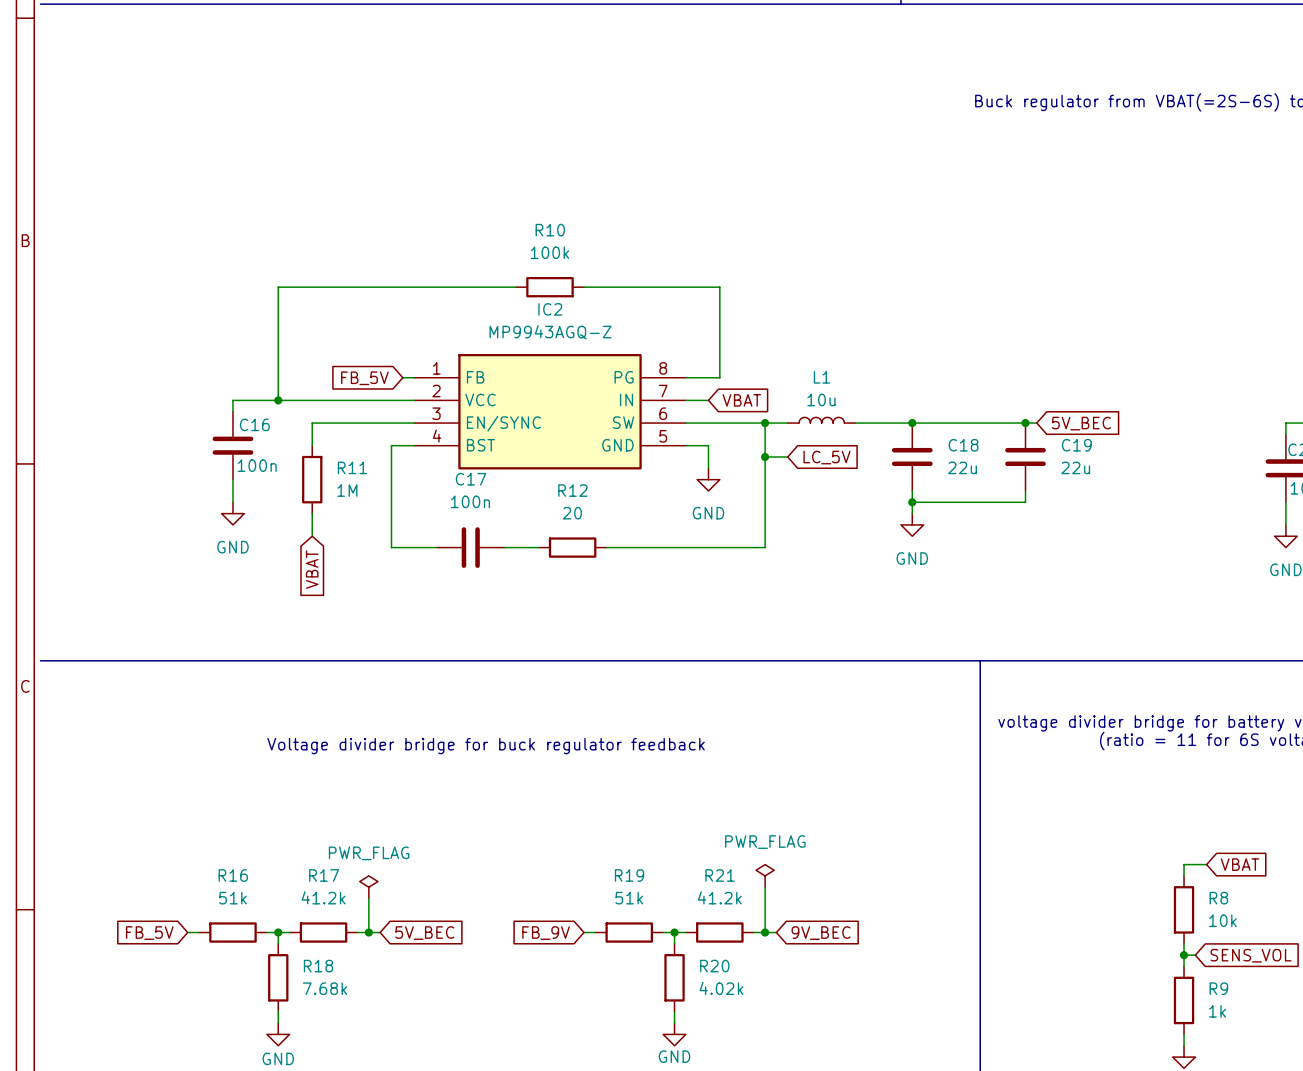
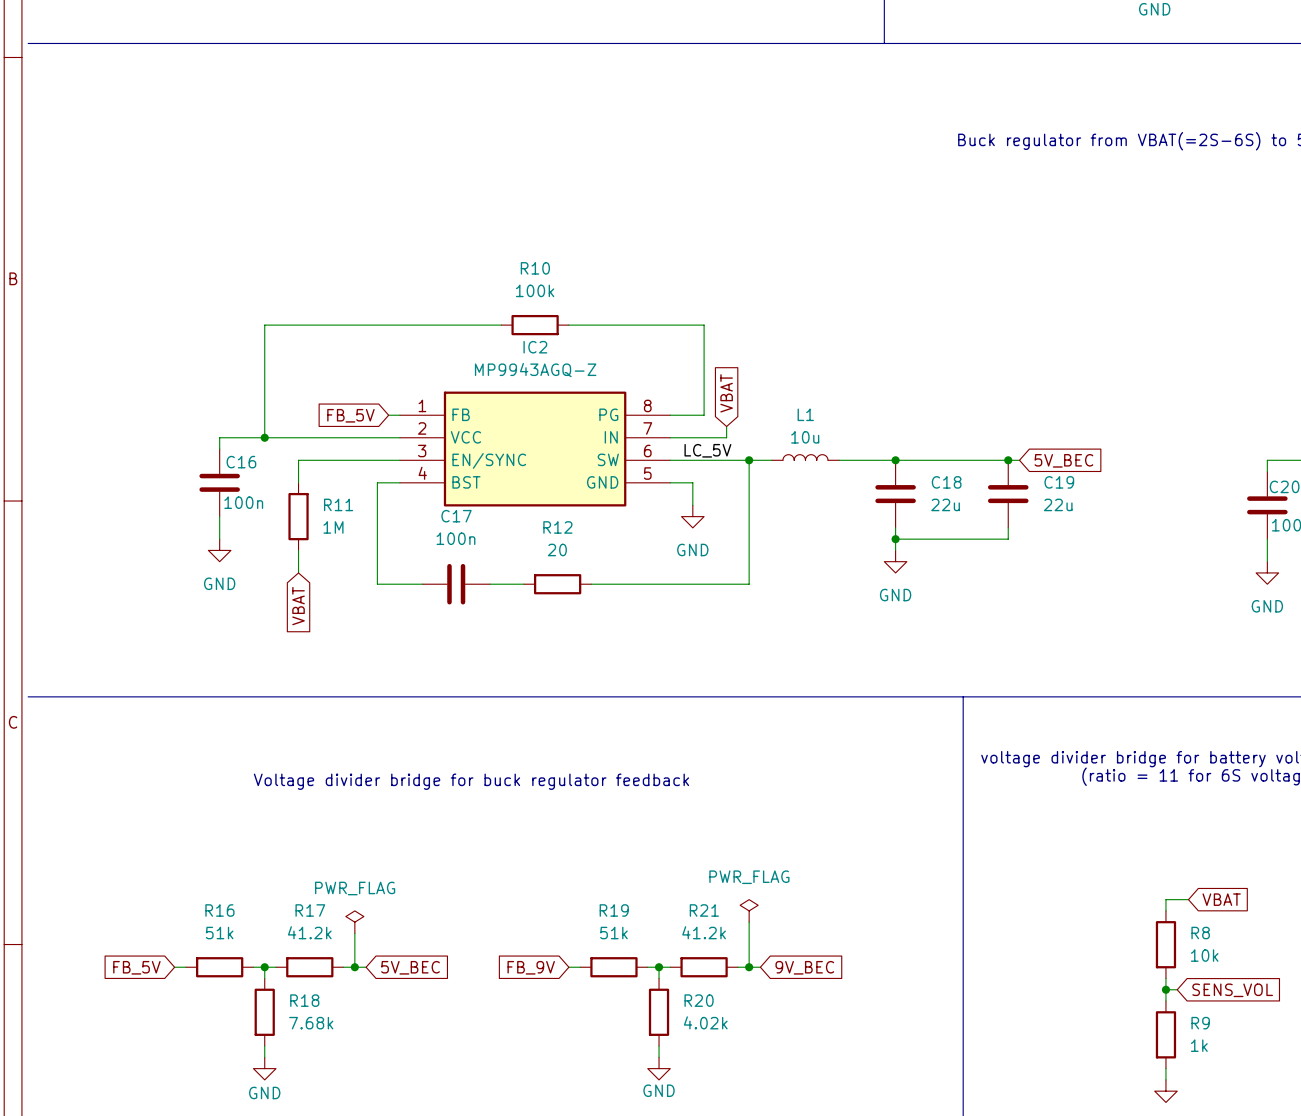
wire: none -> (726, 426) (726, 437) (692, 437)
global label rotation: 0° (741, 400) -> 90° counterclockwise (726, 393)
label: none -> LC_5V (707, 450)
wire: (765, 457) (787, 457) -> none
junction: (765, 457) -> none
global label: LC_5V (826, 457) -> none

